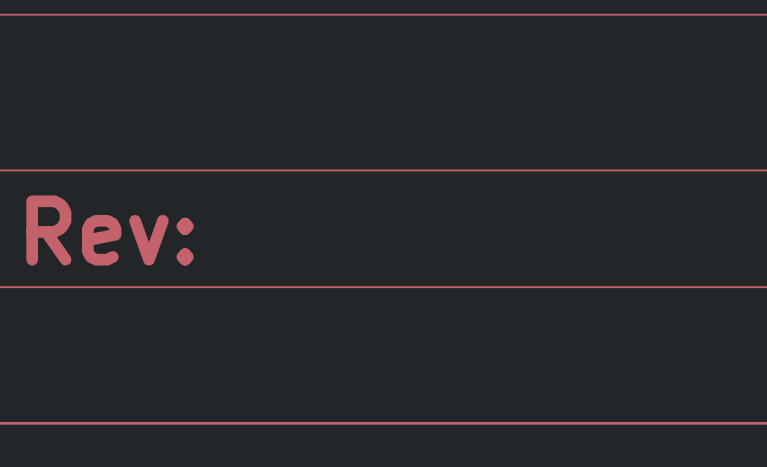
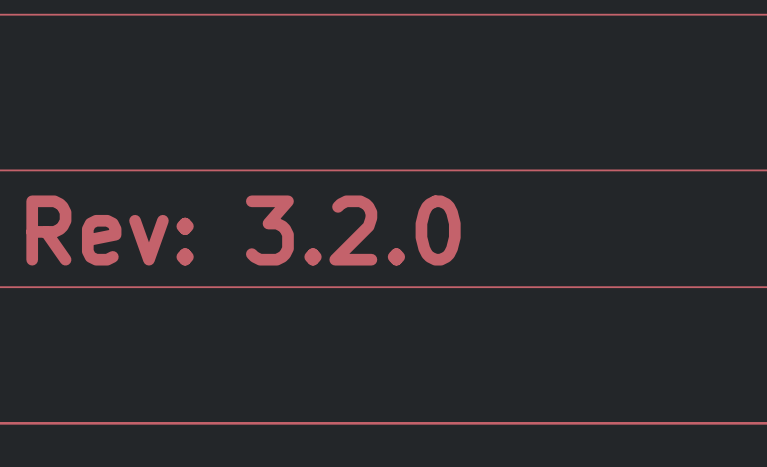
title block: Rev: (110, 230) -> Rev: 3.2.0 (243, 230)

